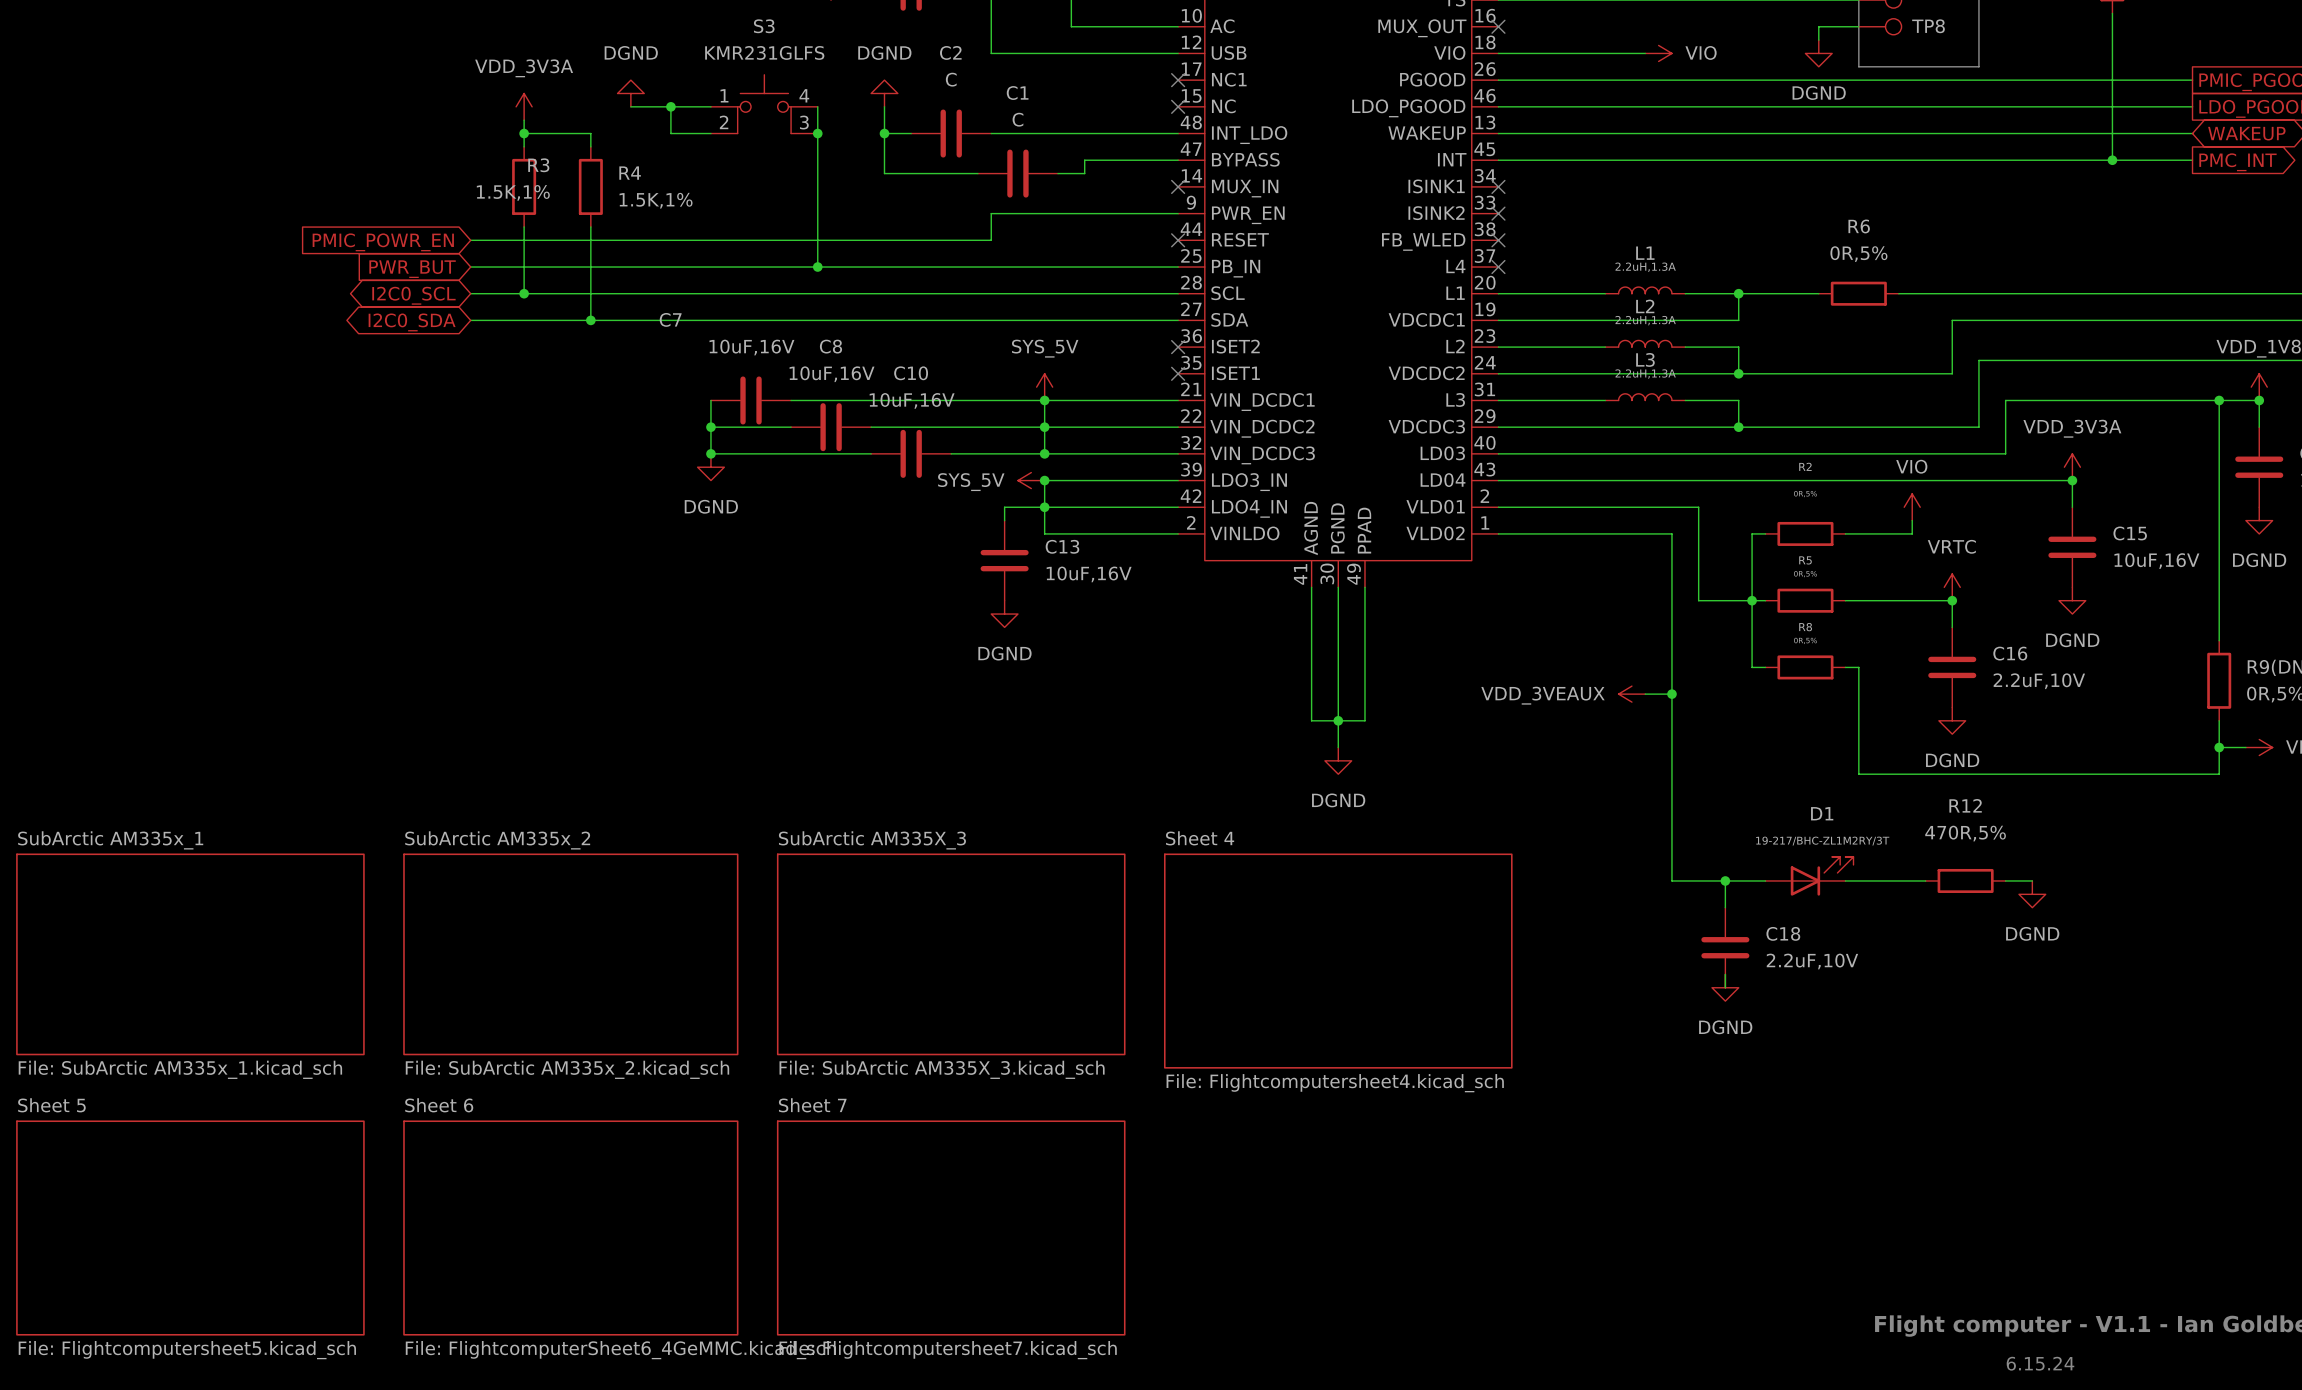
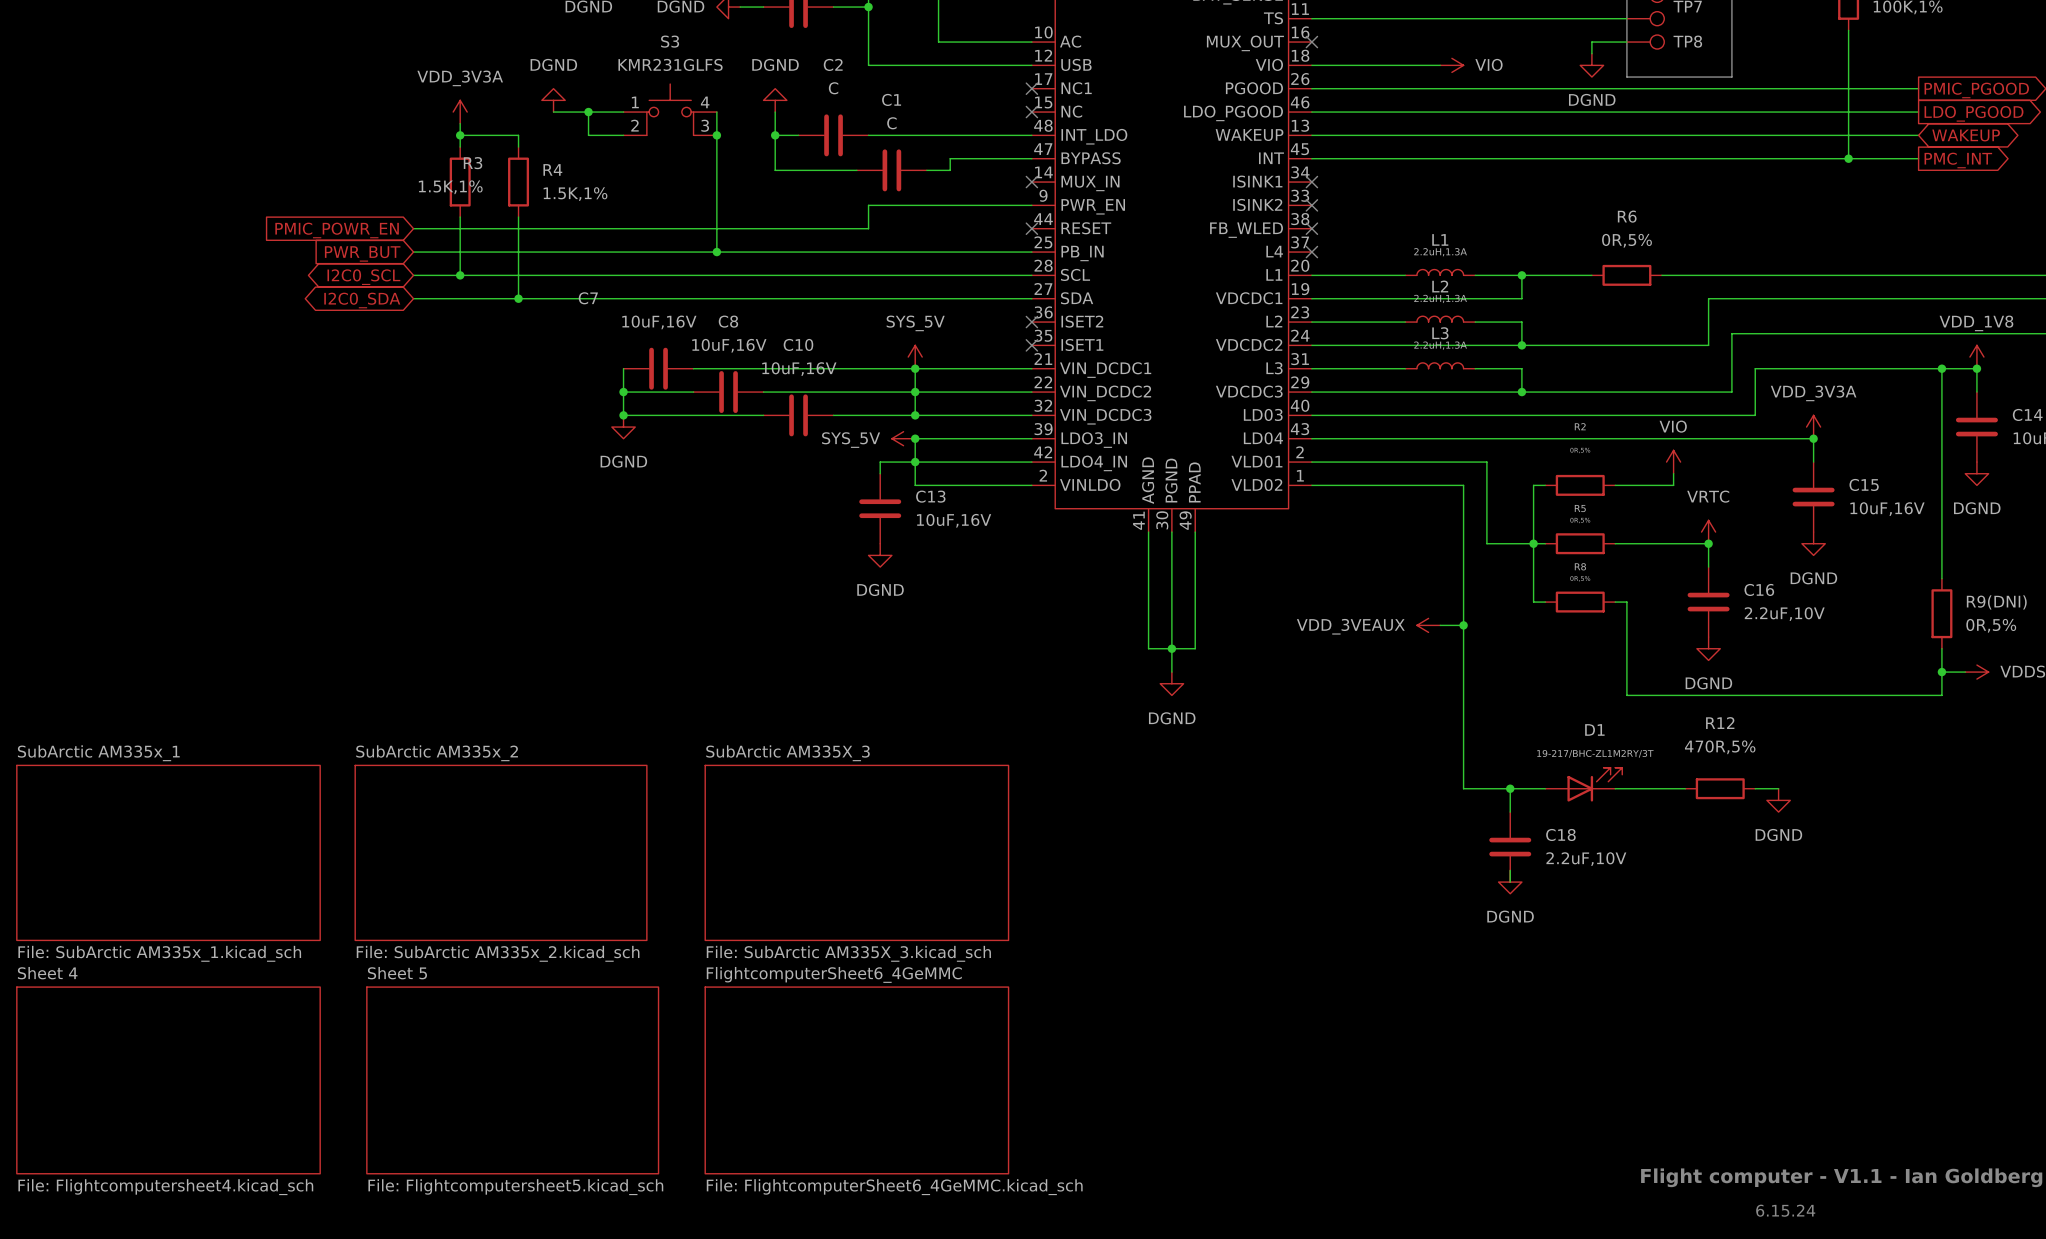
sheet SubArctic AM335X_3 position: (951, 954) -> (856, 852)
sheet Sheet 4 position: (1338, 961) -> (168, 1080)
sheet Sheet 5 shape: [16, 1120, 365, 1336] -> [366, 986, 660, 1175]
sheet FlightcomputerSheet6_4GeMMC: none -> File: FlightcomputerSheet6_4GeMMC.kicad_sch (856, 1080)
sheet Sheet 6: File: FlightcomputerSheet6_4GeMMC.kicad_sch (570, 1228) -> none
sheet Sheet 7: File: Flightcomputersheet7.kicad_sch (951, 1228) -> none

